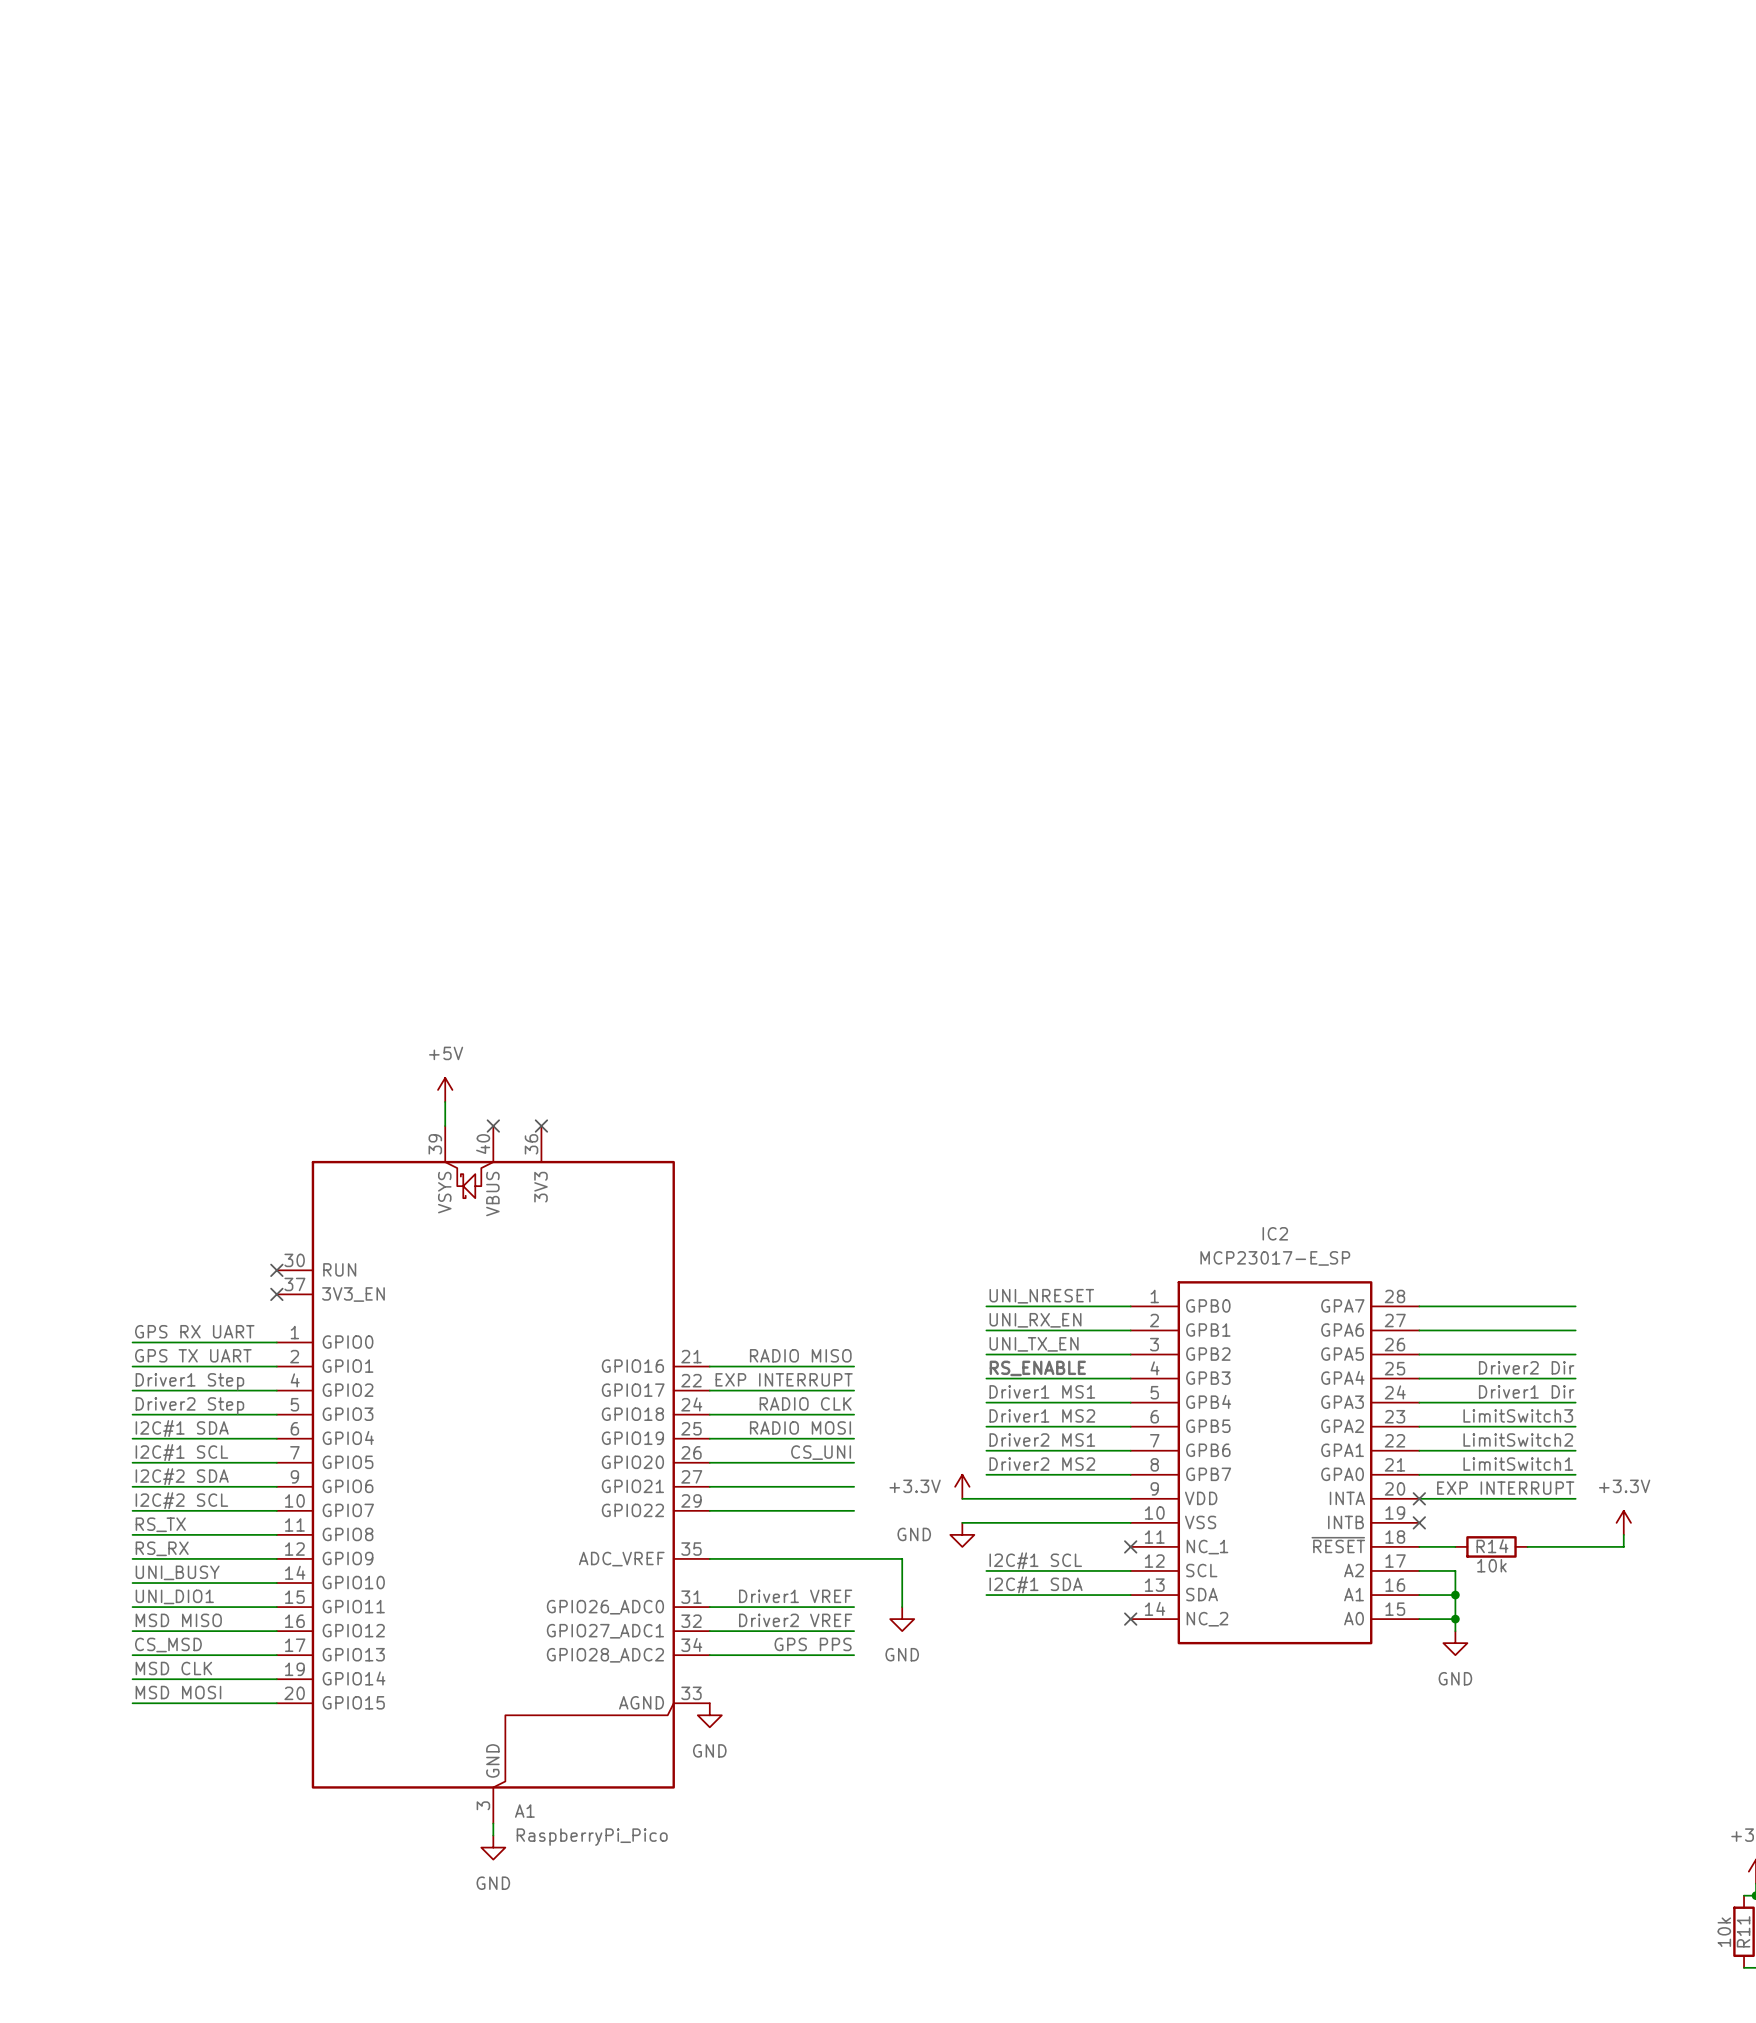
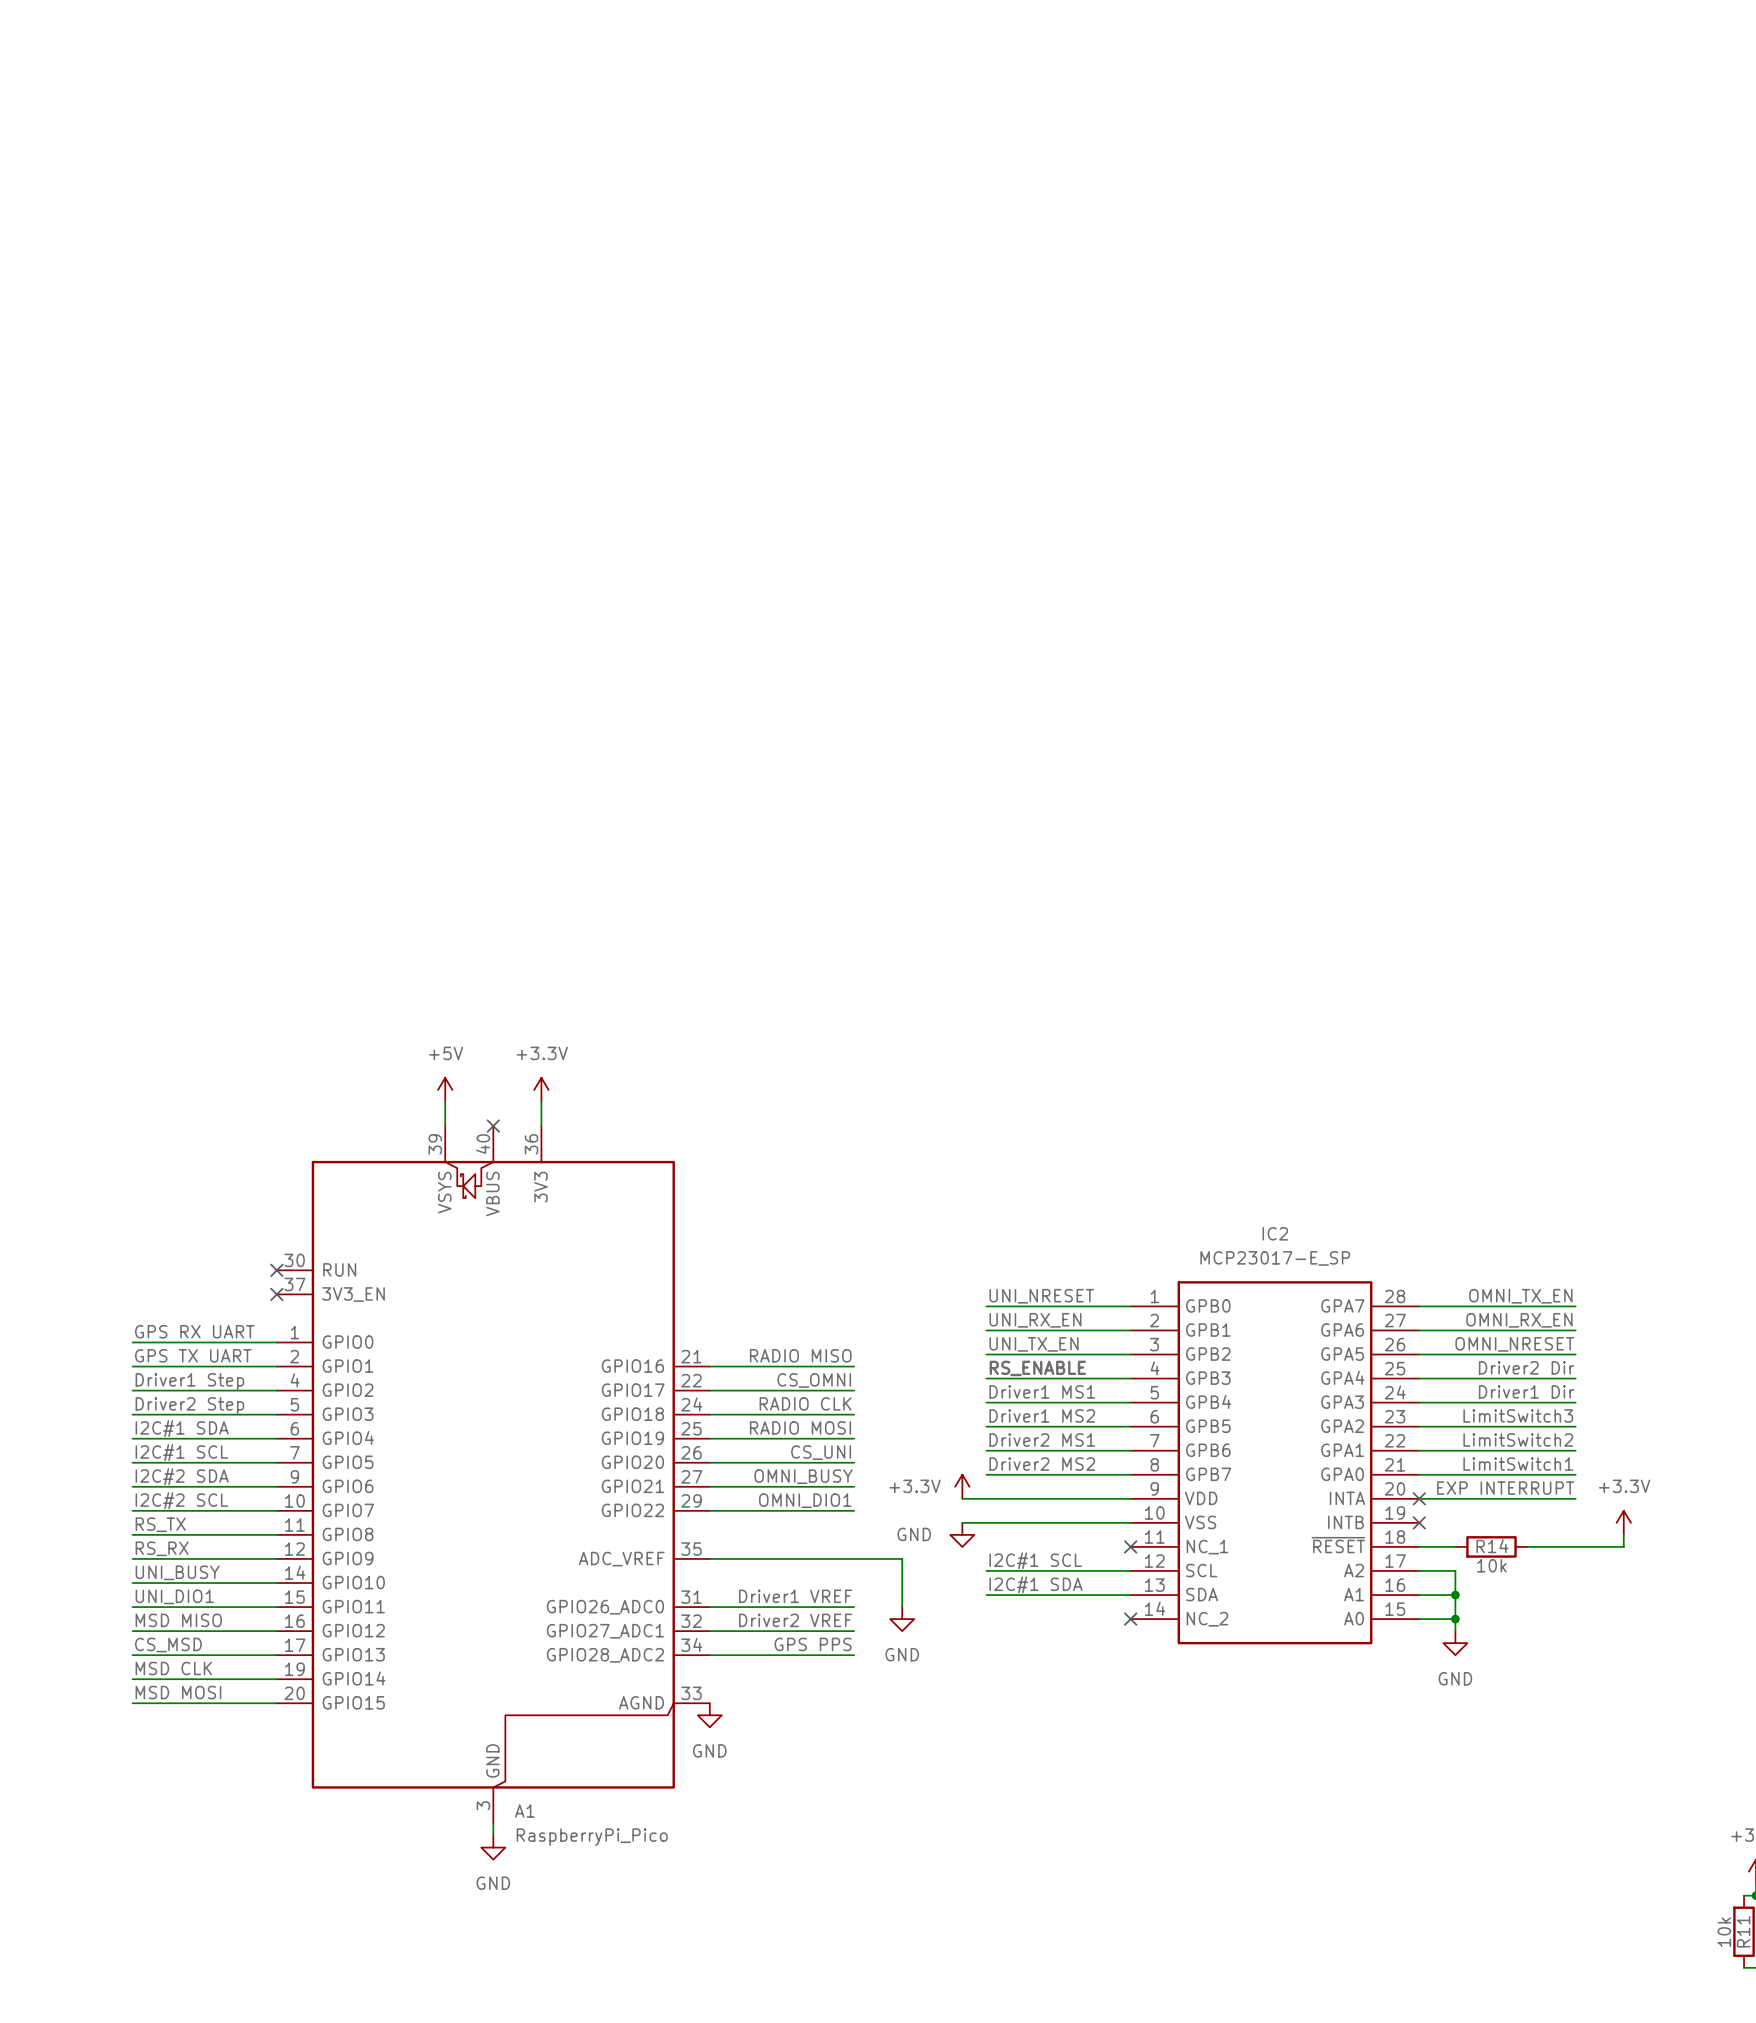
power symbol: none -> +3.3V (541, 1089)
wire: none -> (541, 1101) (541, 1126)
no-connect mark: (541, 1126) -> none
label: none -> OMNI_TX_EN (1520, 1296)
label: none -> OMNI_RX_EN (1519, 1320)
label: none -> OMNI_NRESET (1514, 1344)
label: EXP INTERRUPT (784, 1379) -> CS_OMNI (814, 1380)
label: none -> OMNI_BUSY (803, 1476)
label: none -> OMNI_DIO1 (805, 1500)

